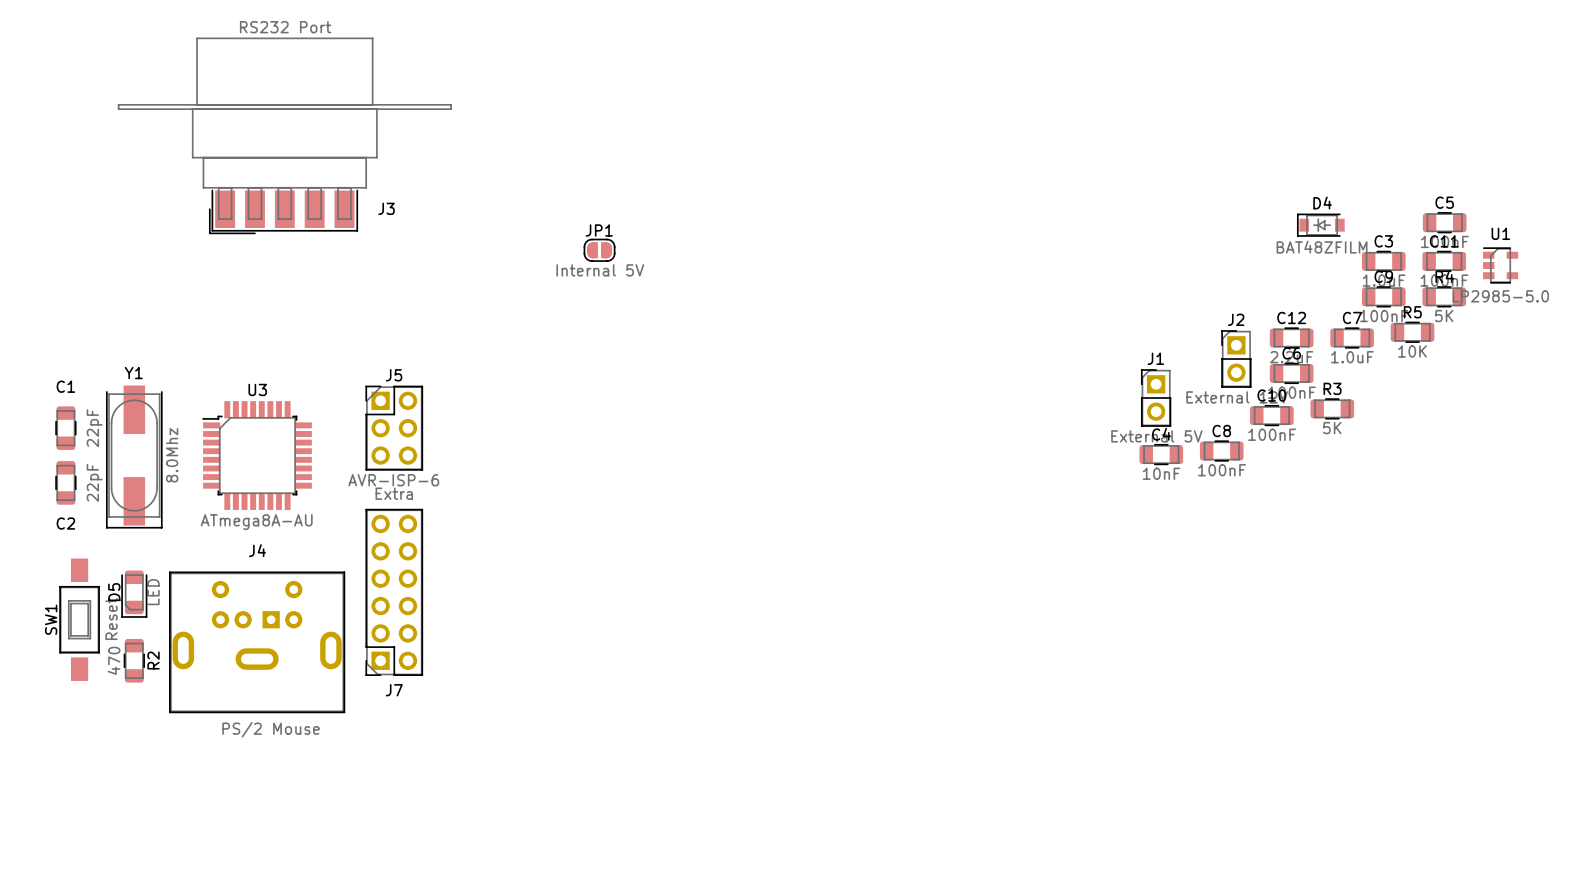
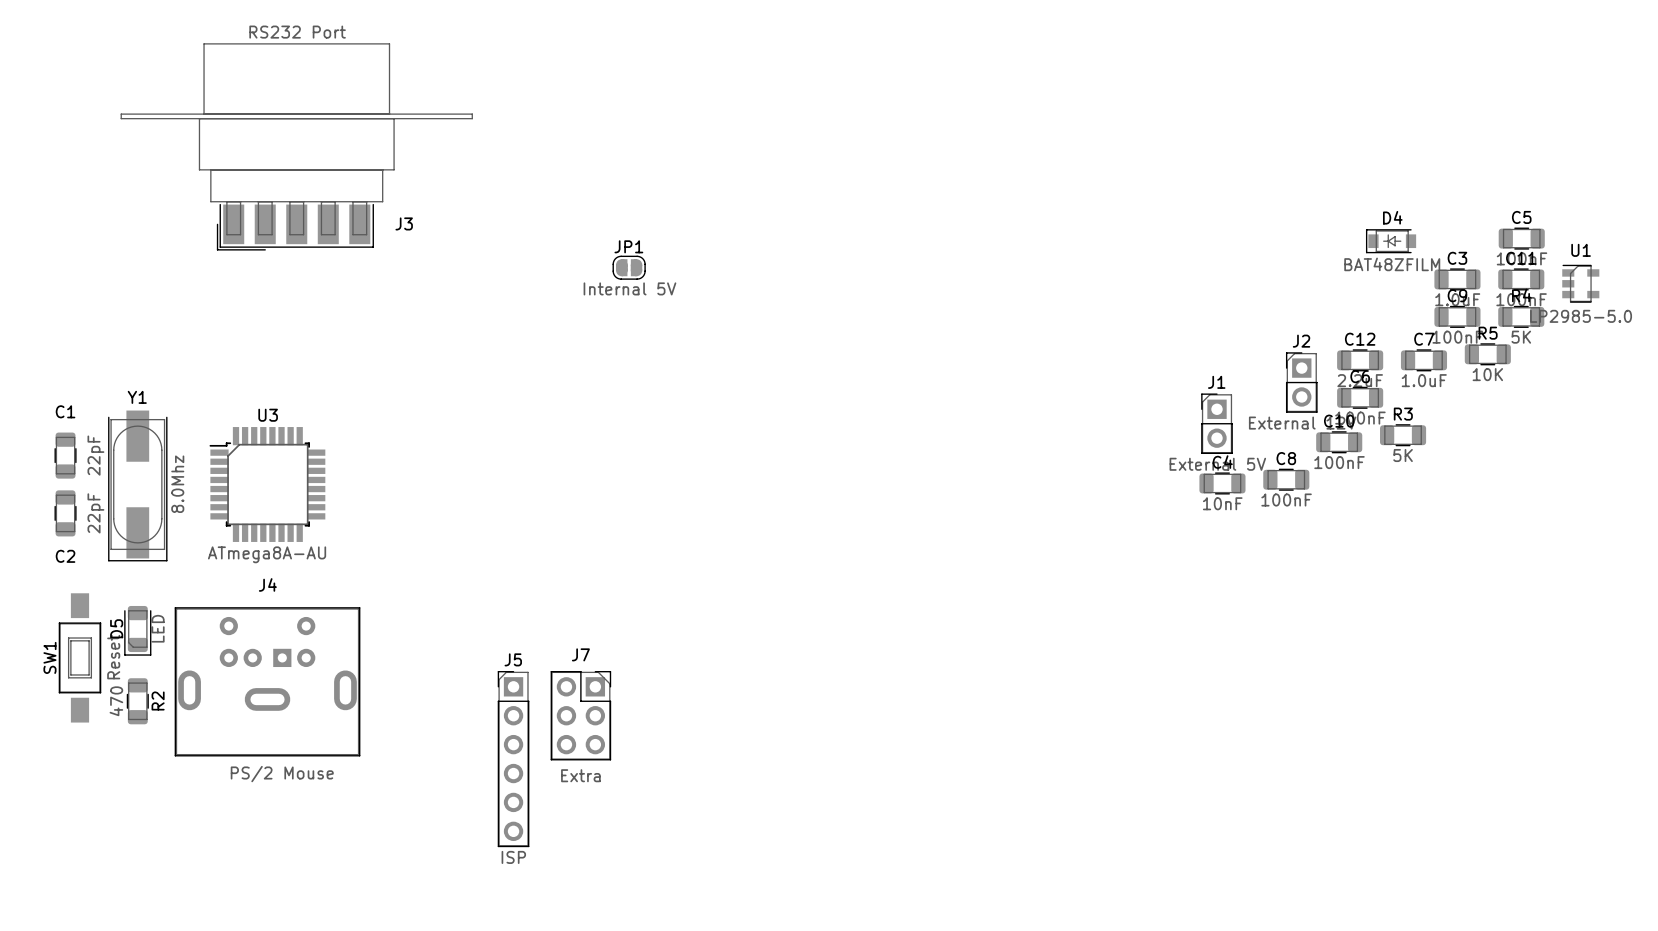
J5 name position: J5 (394, 375) -> J5 (513, 659)
J5 footprint: [365, 385, 423, 471] -> [497, 671, 530, 848]
J5 value: AVR-ISP-6 (393, 480) -> ISP (513, 857)
J7 value position: Extra (394, 493) -> Extra (580, 775)
J7 footprint: [365, 508, 423, 676] -> [550, 671, 612, 761]
J7 name position: J7 (394, 690) -> J7 (580, 654)

